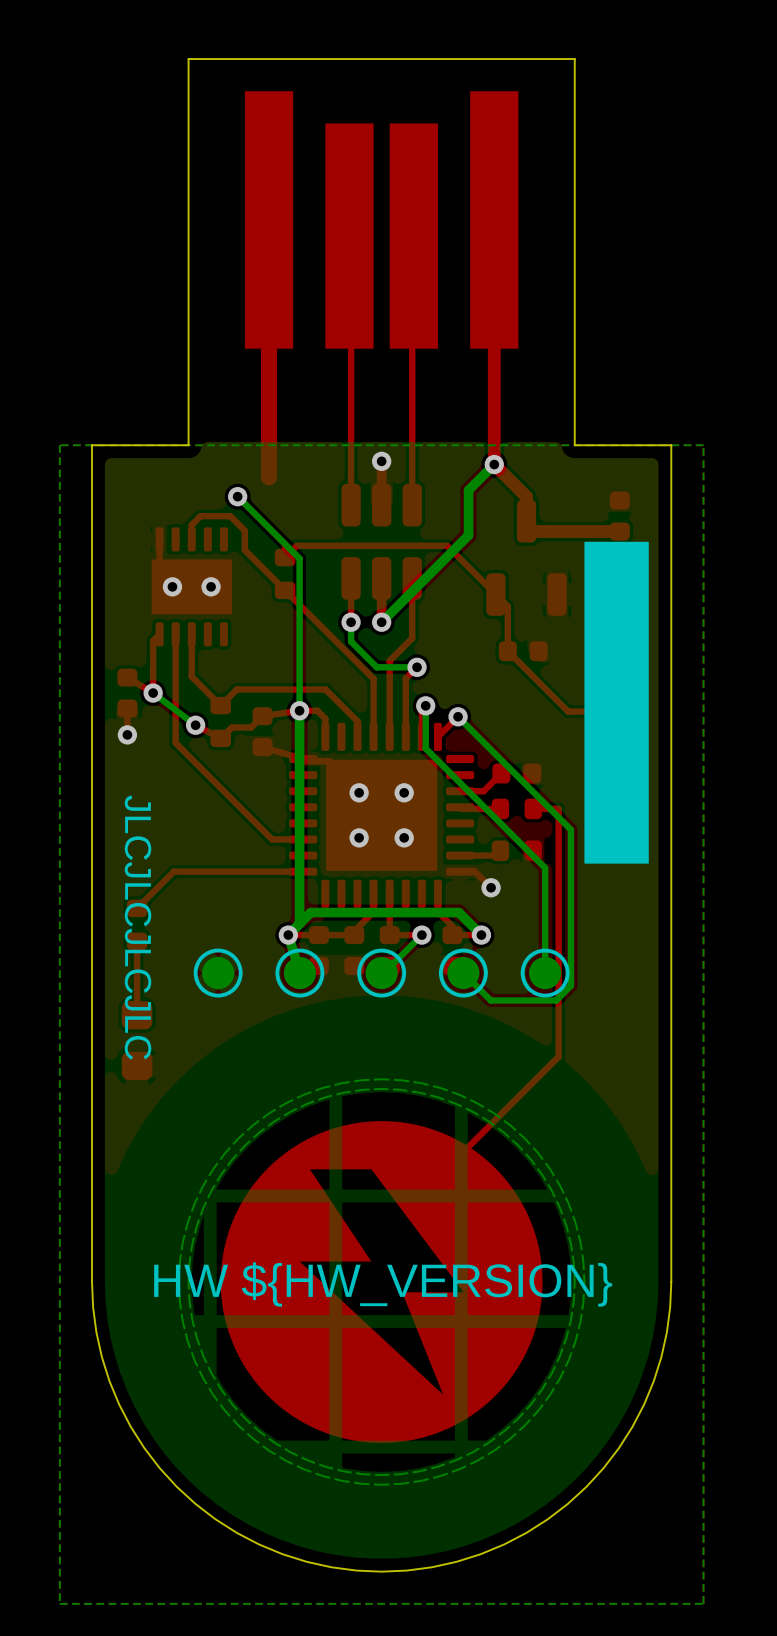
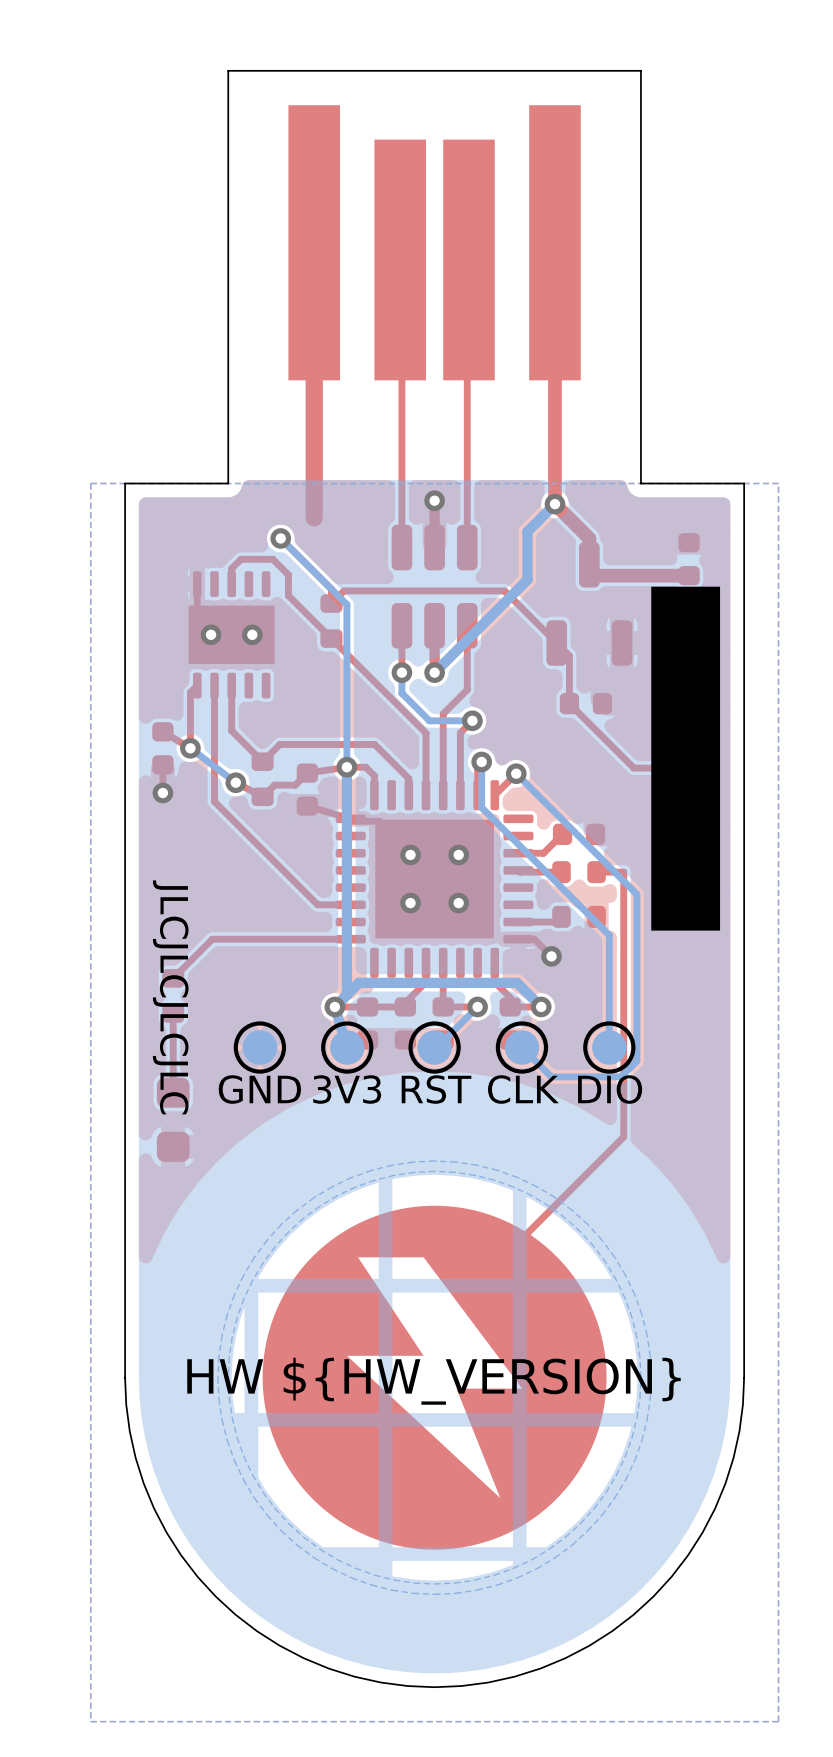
text: none -> GND (259, 1089)
text: none -> 3V3 (347, 1089)
text: none -> RST (436, 1089)
text: none -> CLK (523, 1089)
text: none -> DIO (610, 1089)

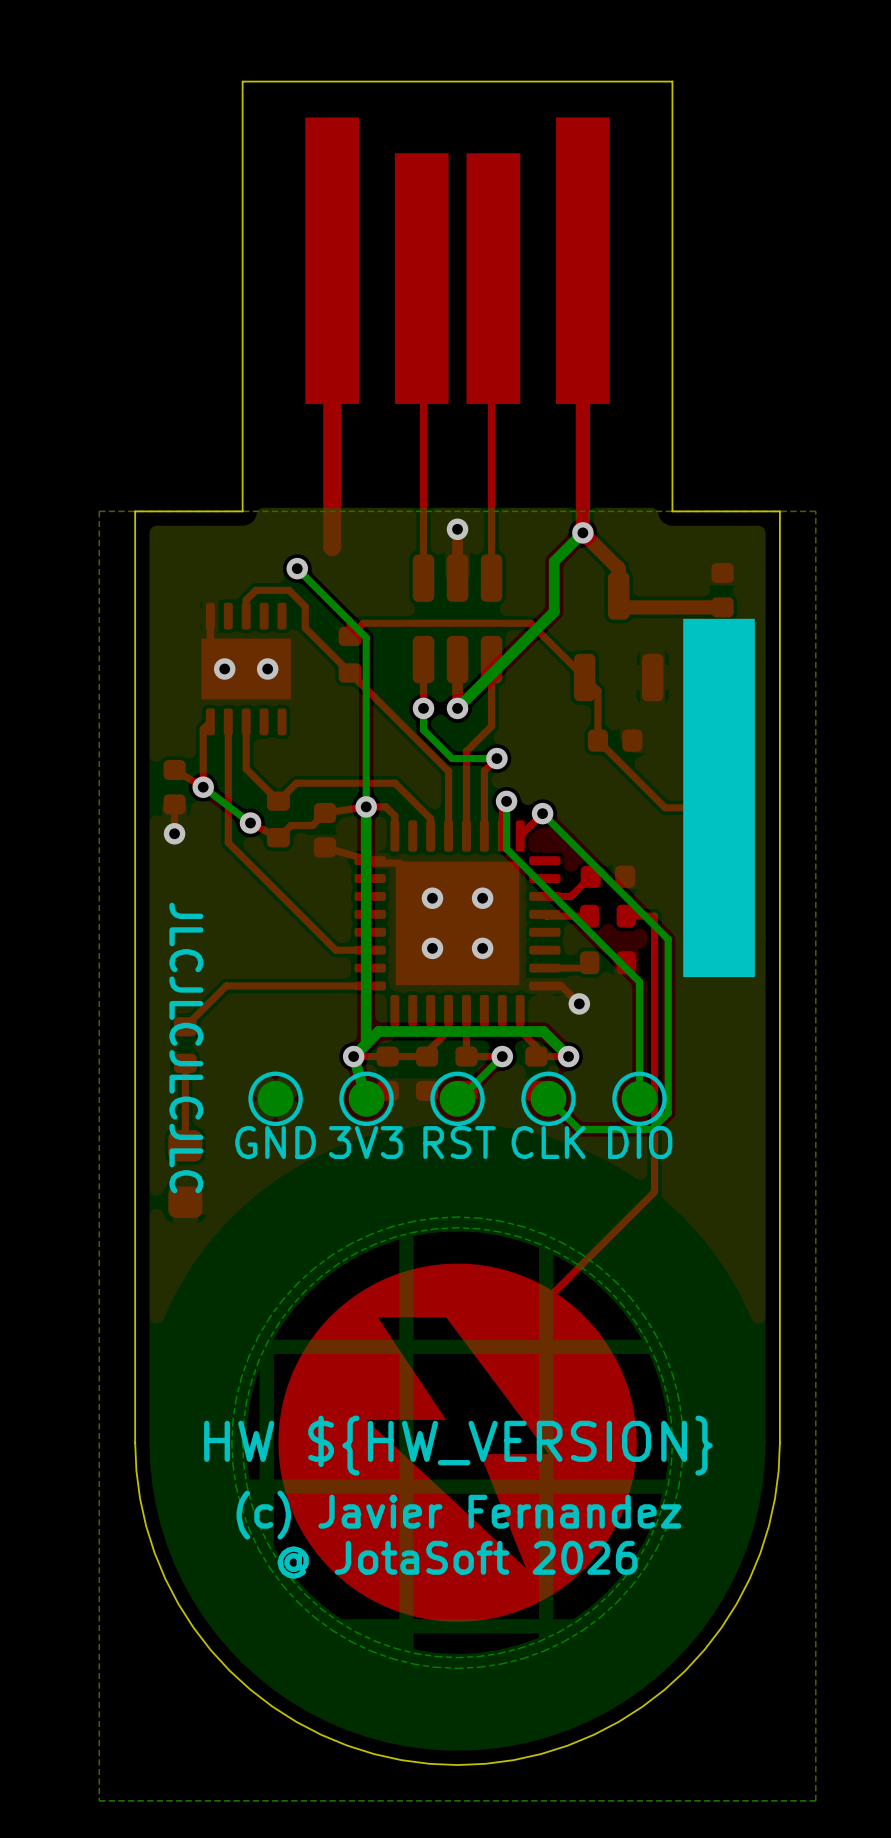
text: none -> (c) Javier Fernandez (458, 1515)
text: none -> @ JotaSoft 2026 (457, 1559)

